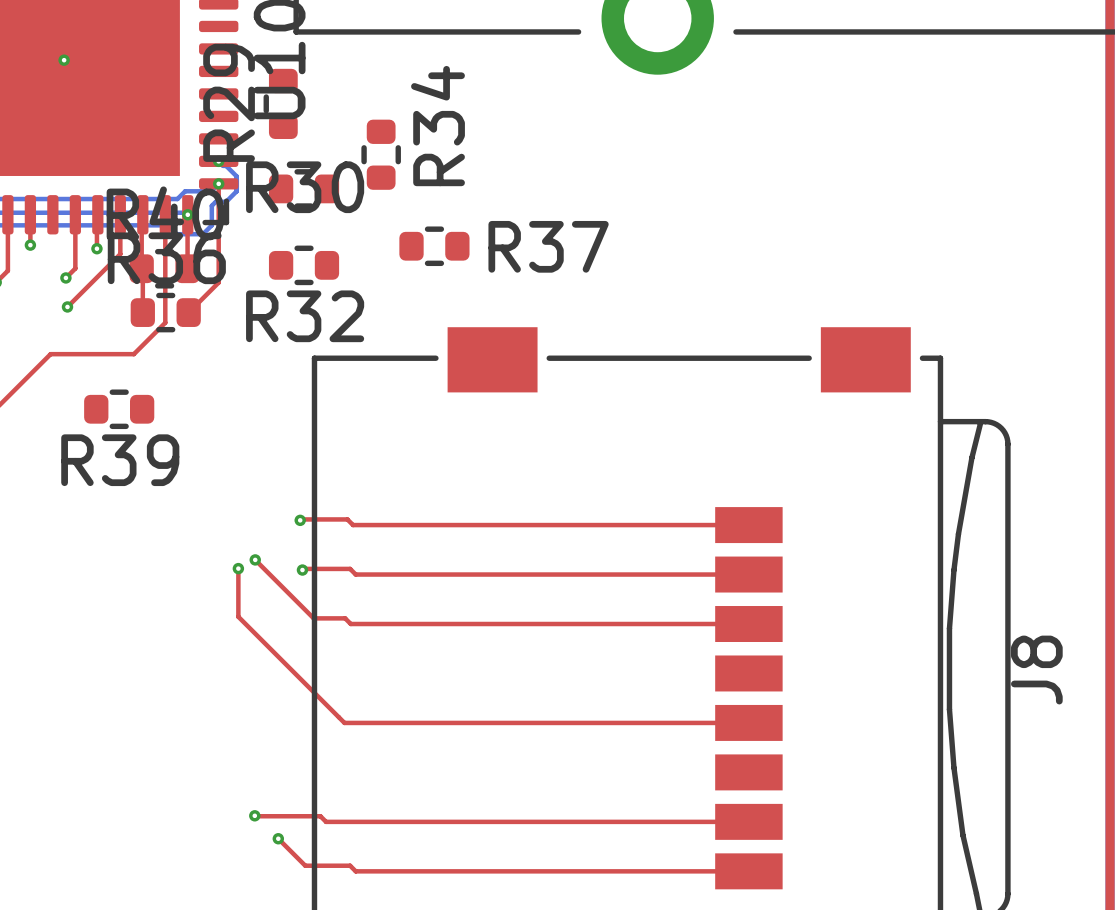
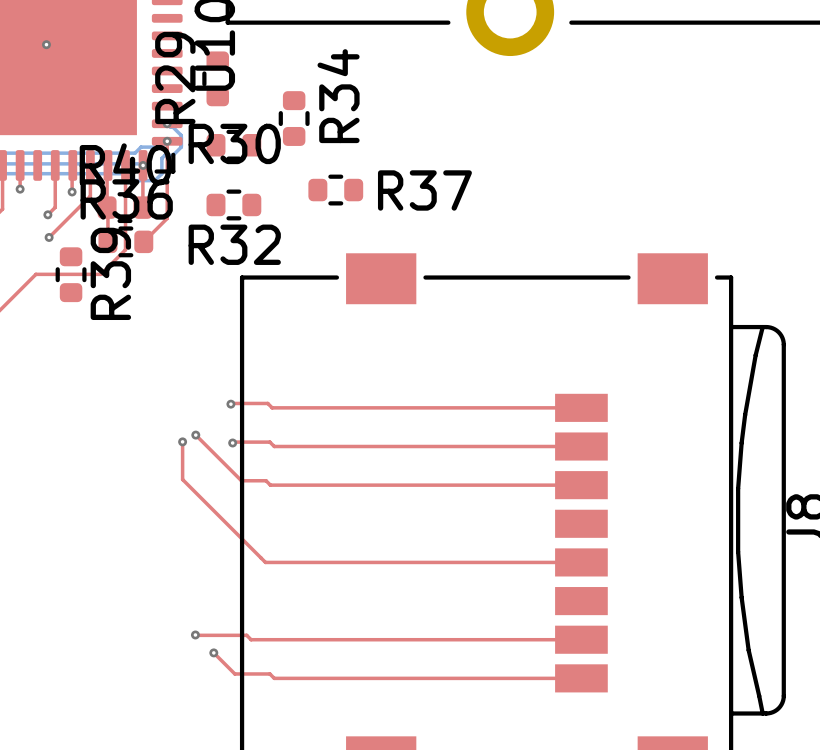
R39 rotation: 0° (119, 409) -> 90° clockwise (71, 274)
R39 position: (119, 409) -> (71, 274)

